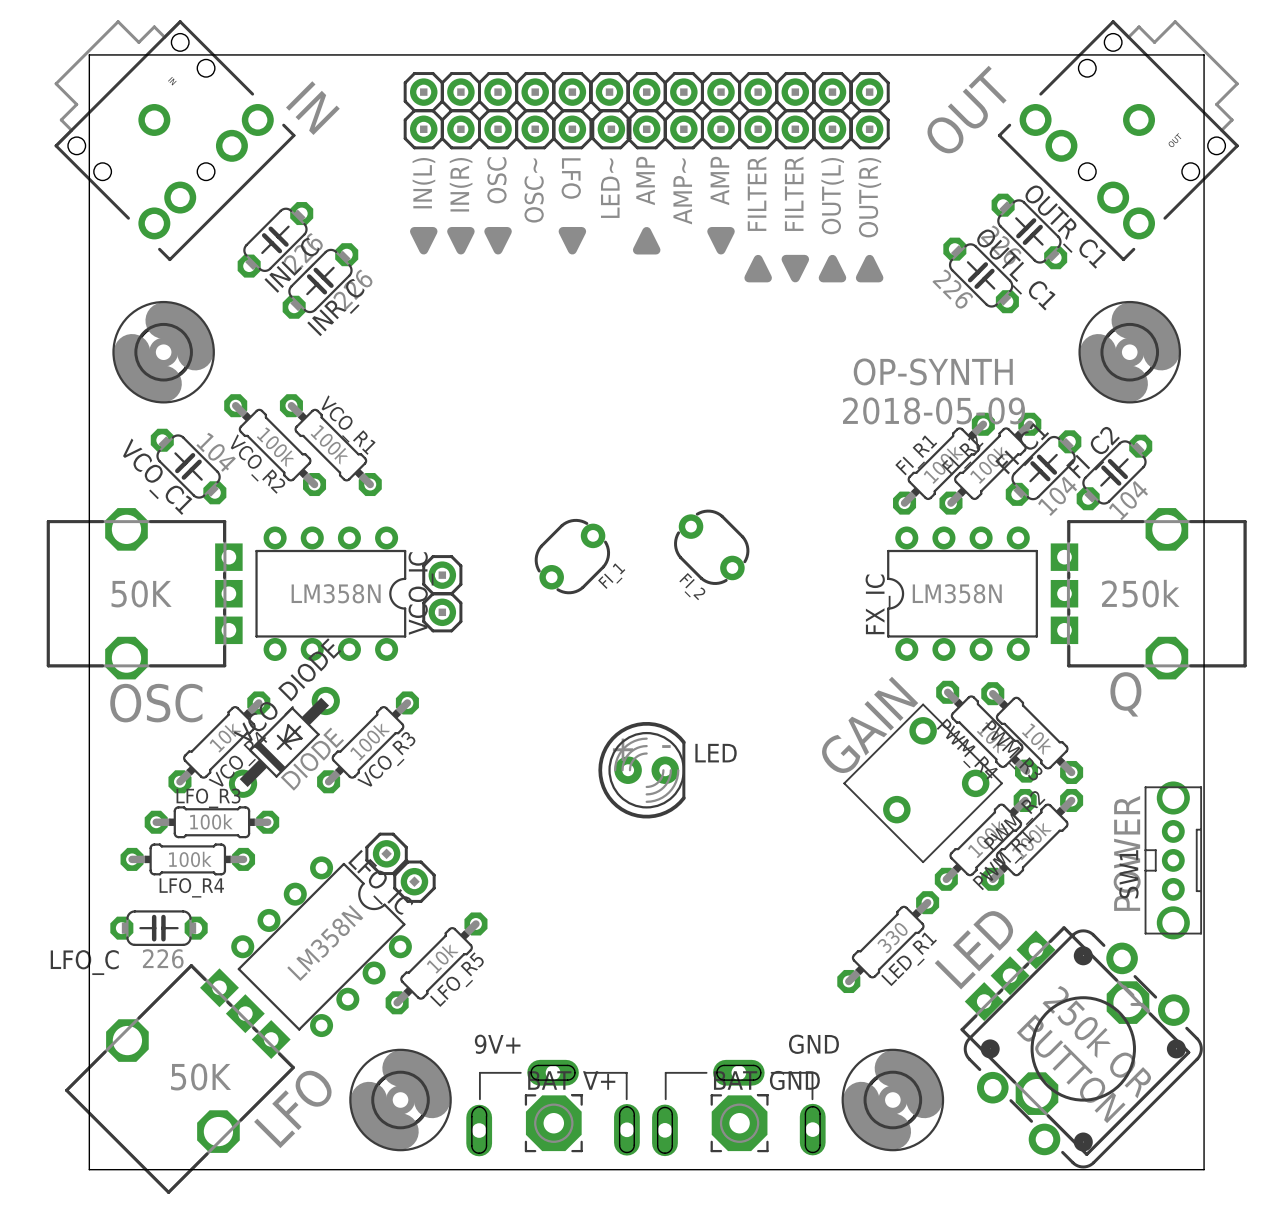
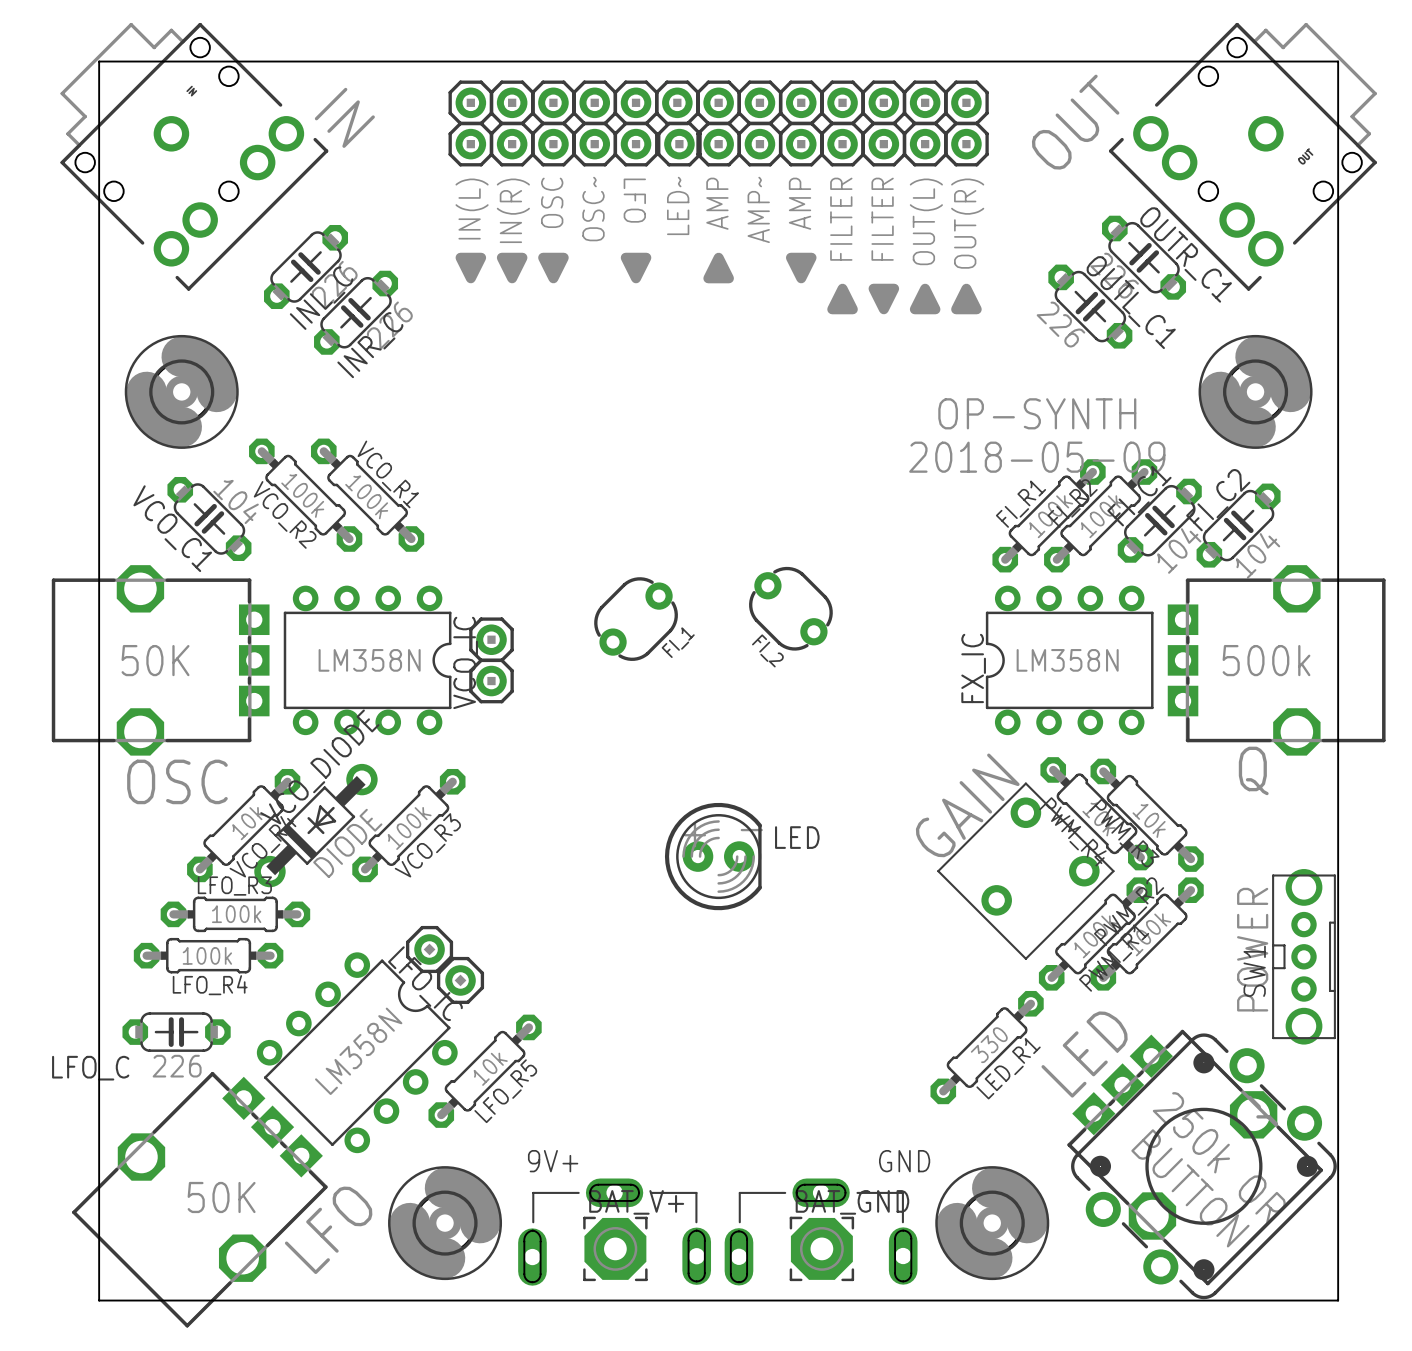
text: 250k (1140, 593) -> 500k (1266, 660)

